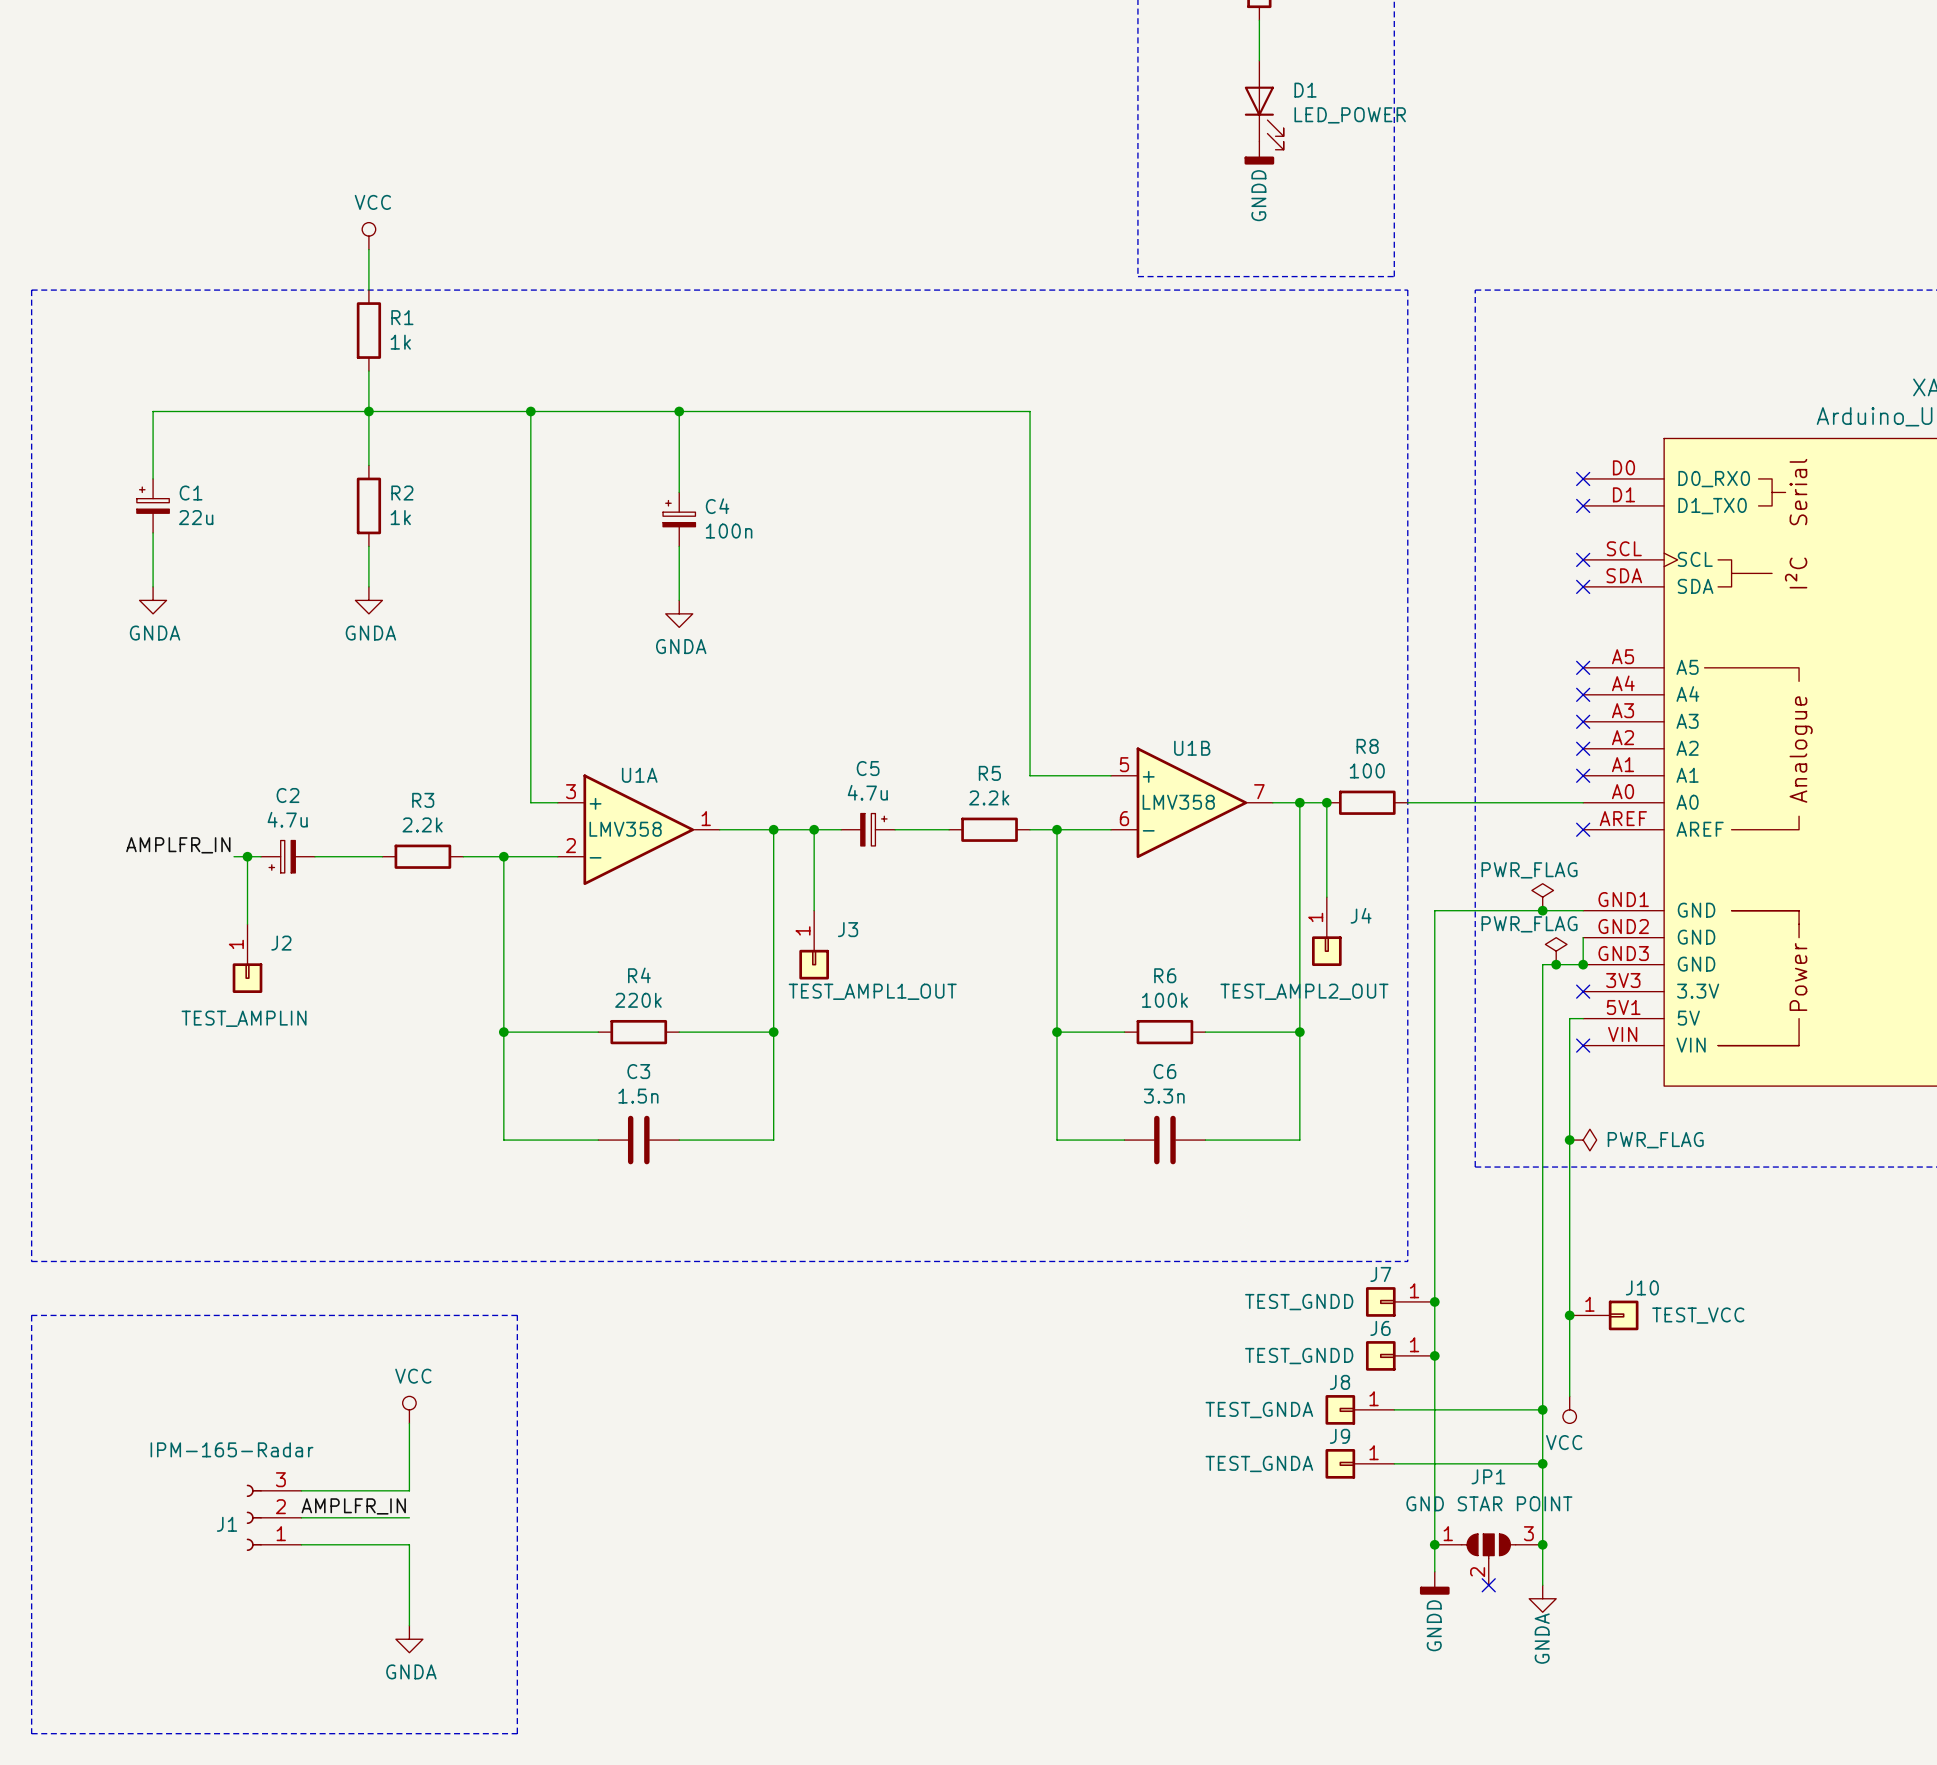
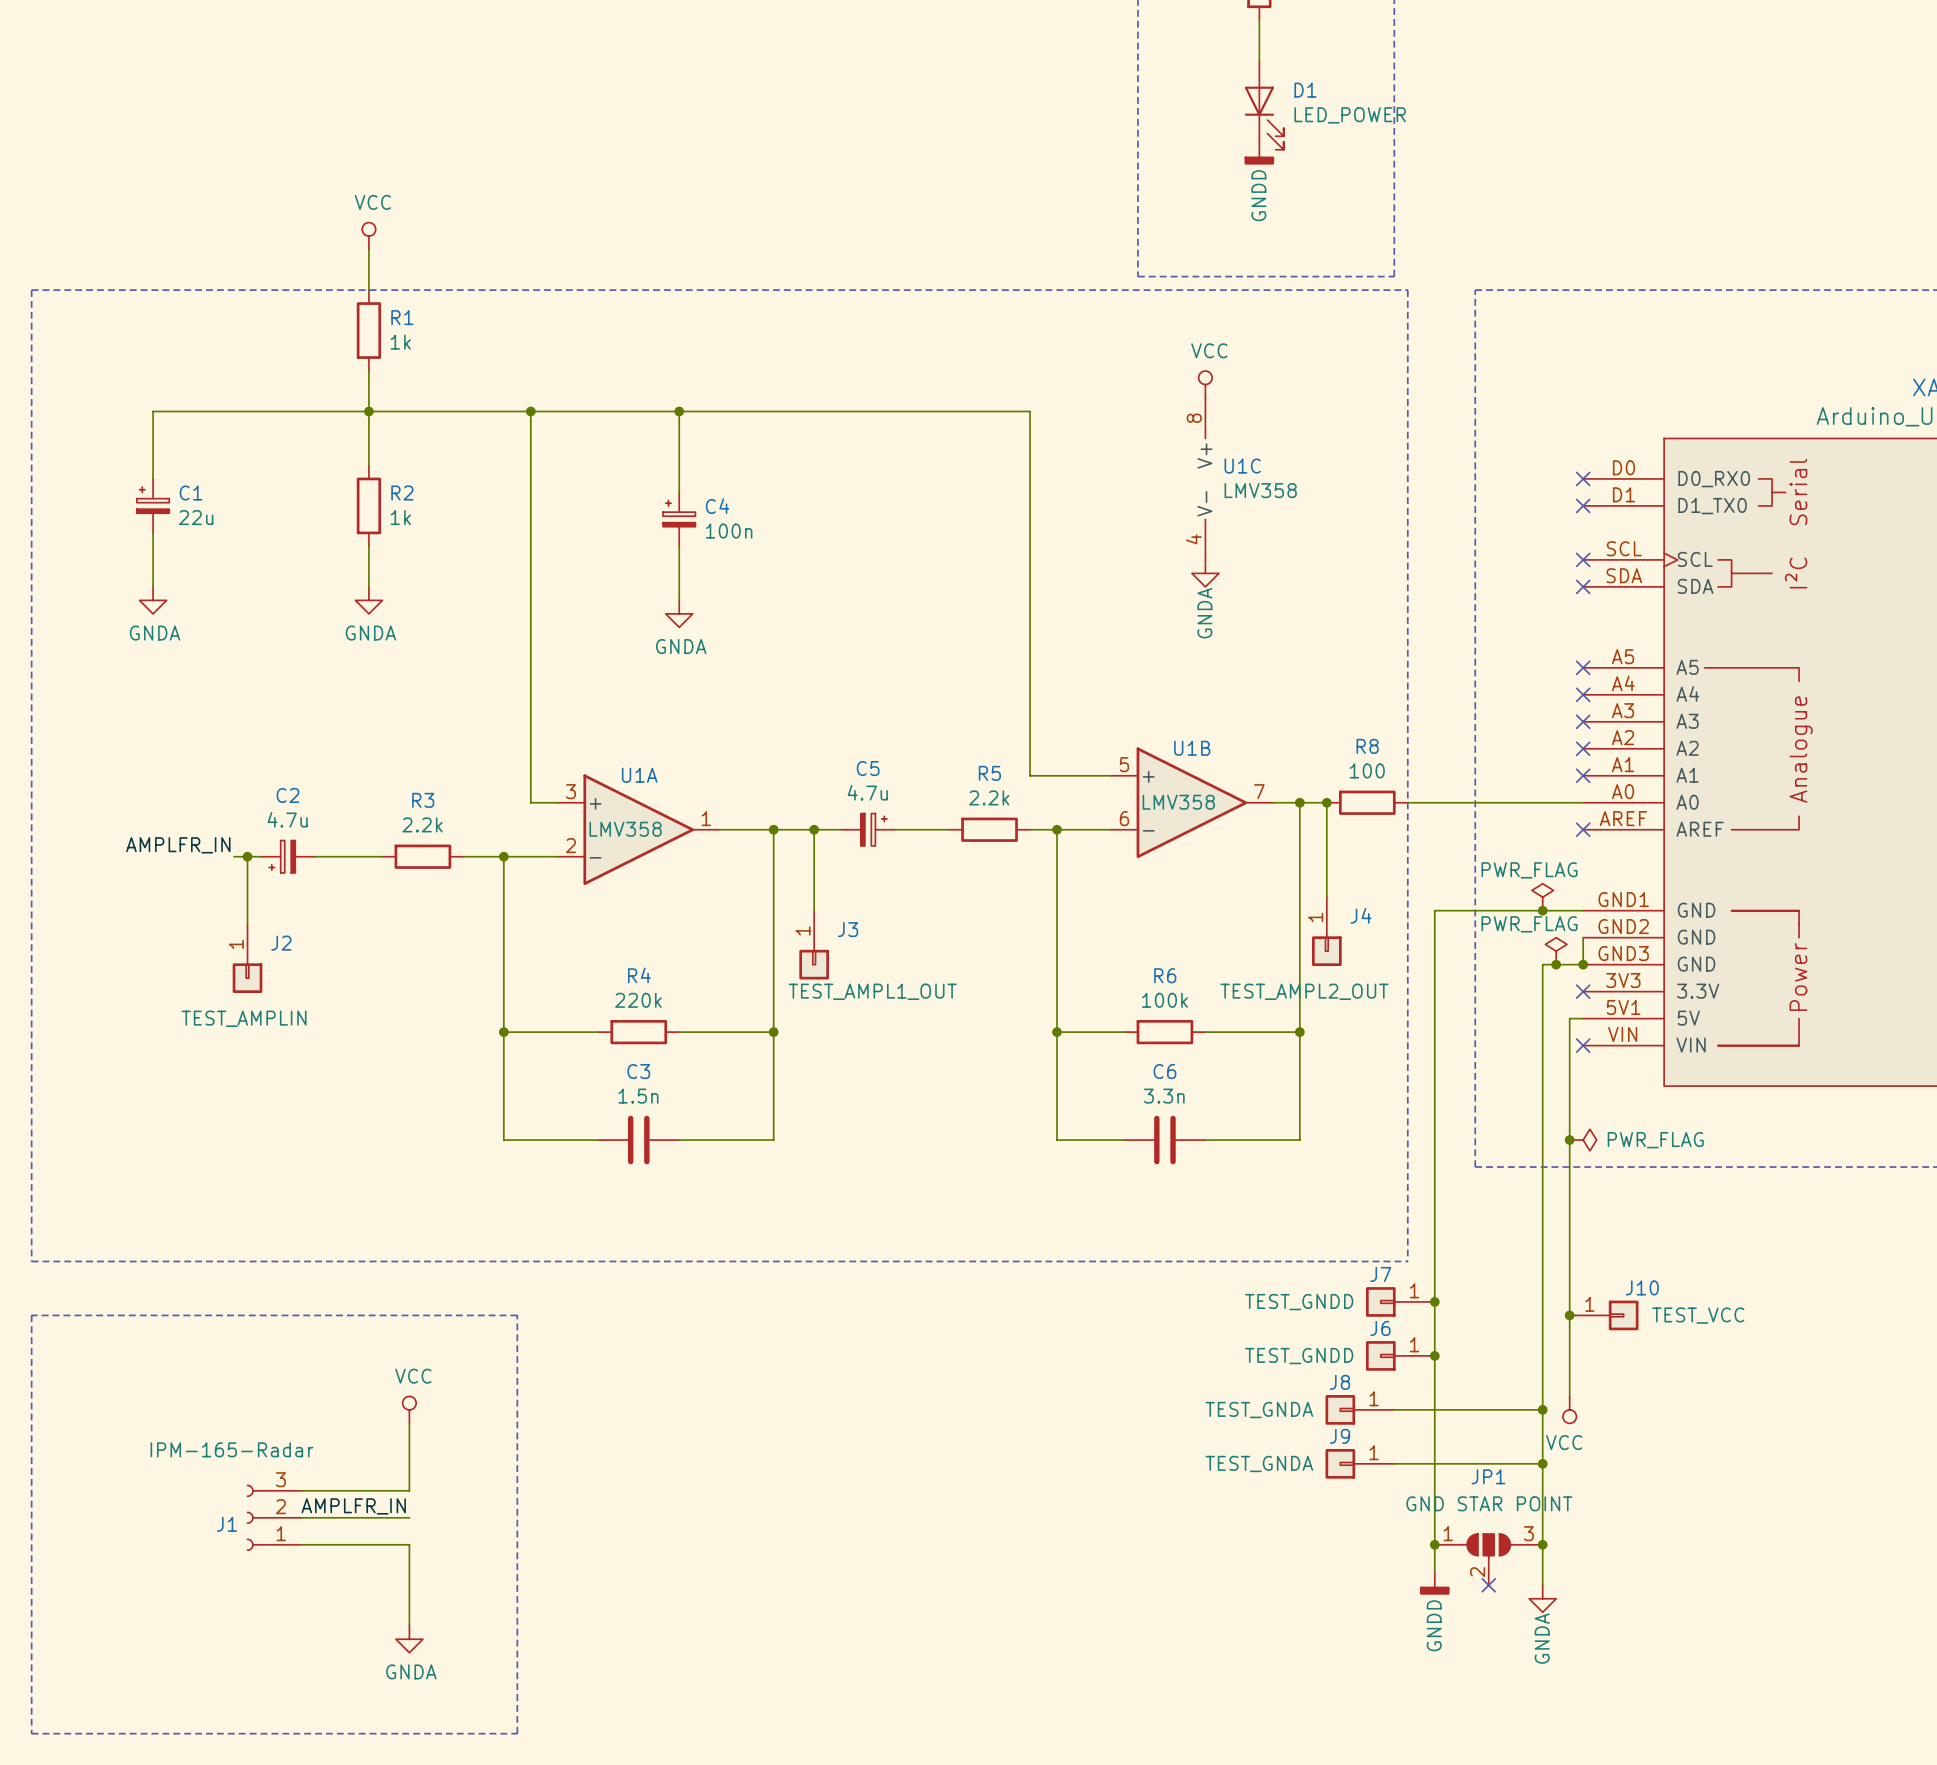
power symbol: none -> VCC (1205, 384)
U1C: none -> LMV358 (1205, 478)
power symbol: none -> GNDA (1205, 573)

